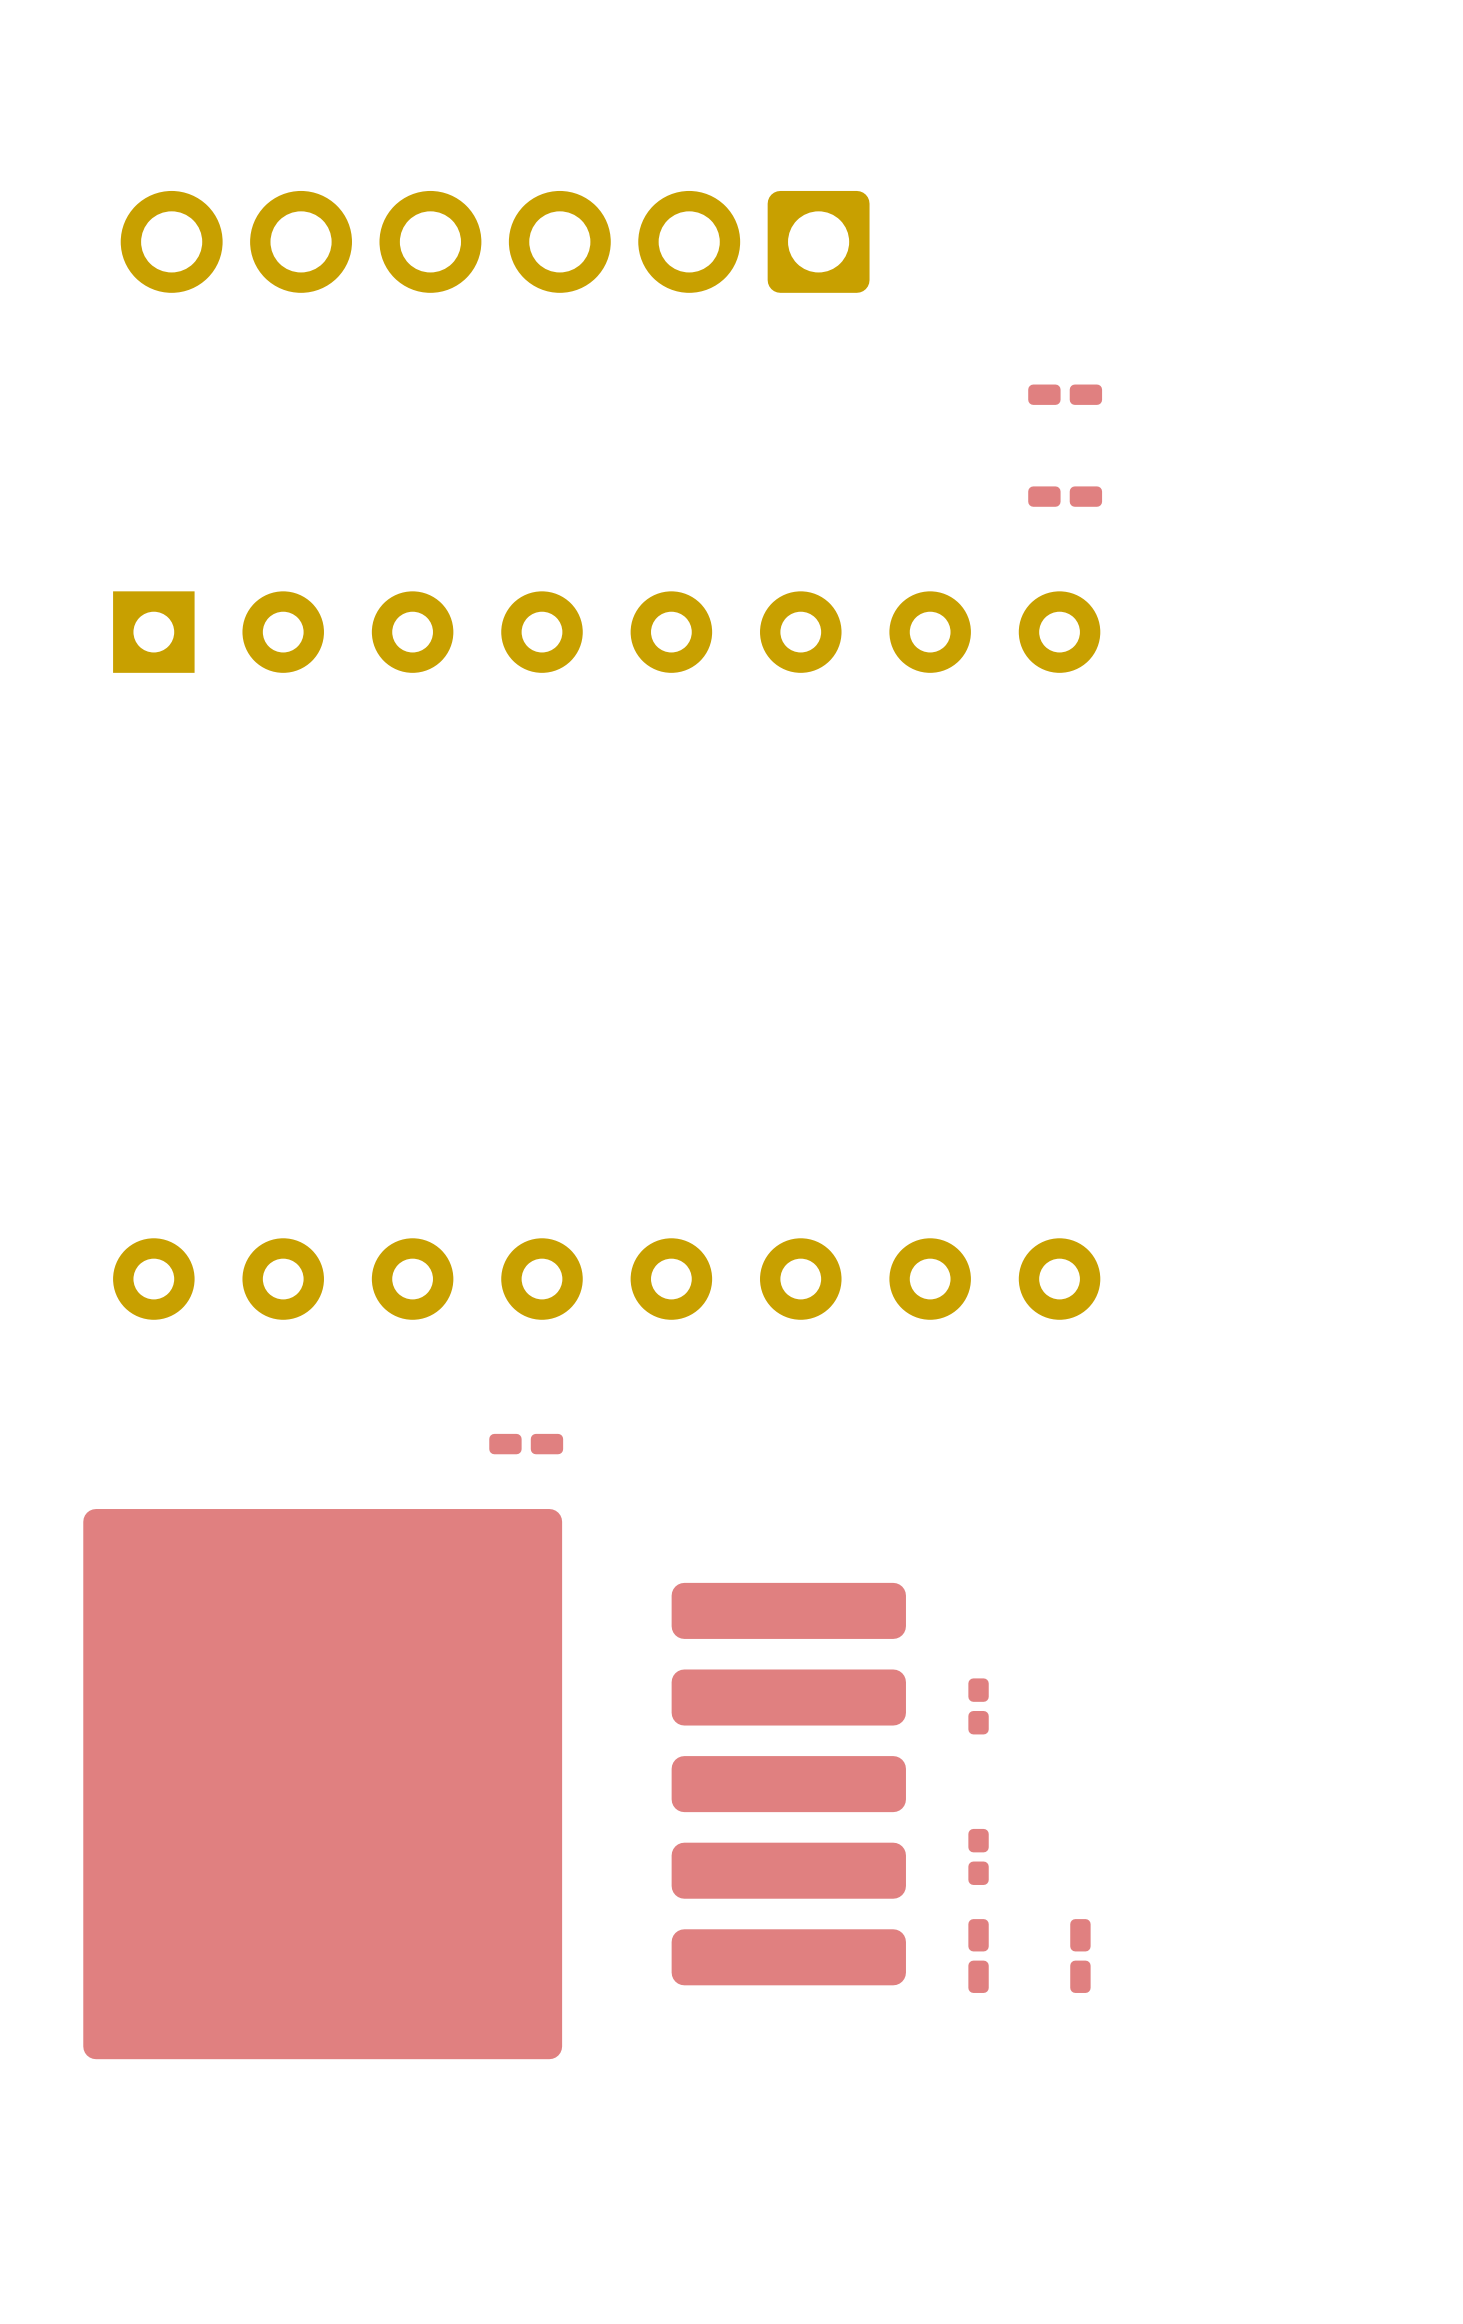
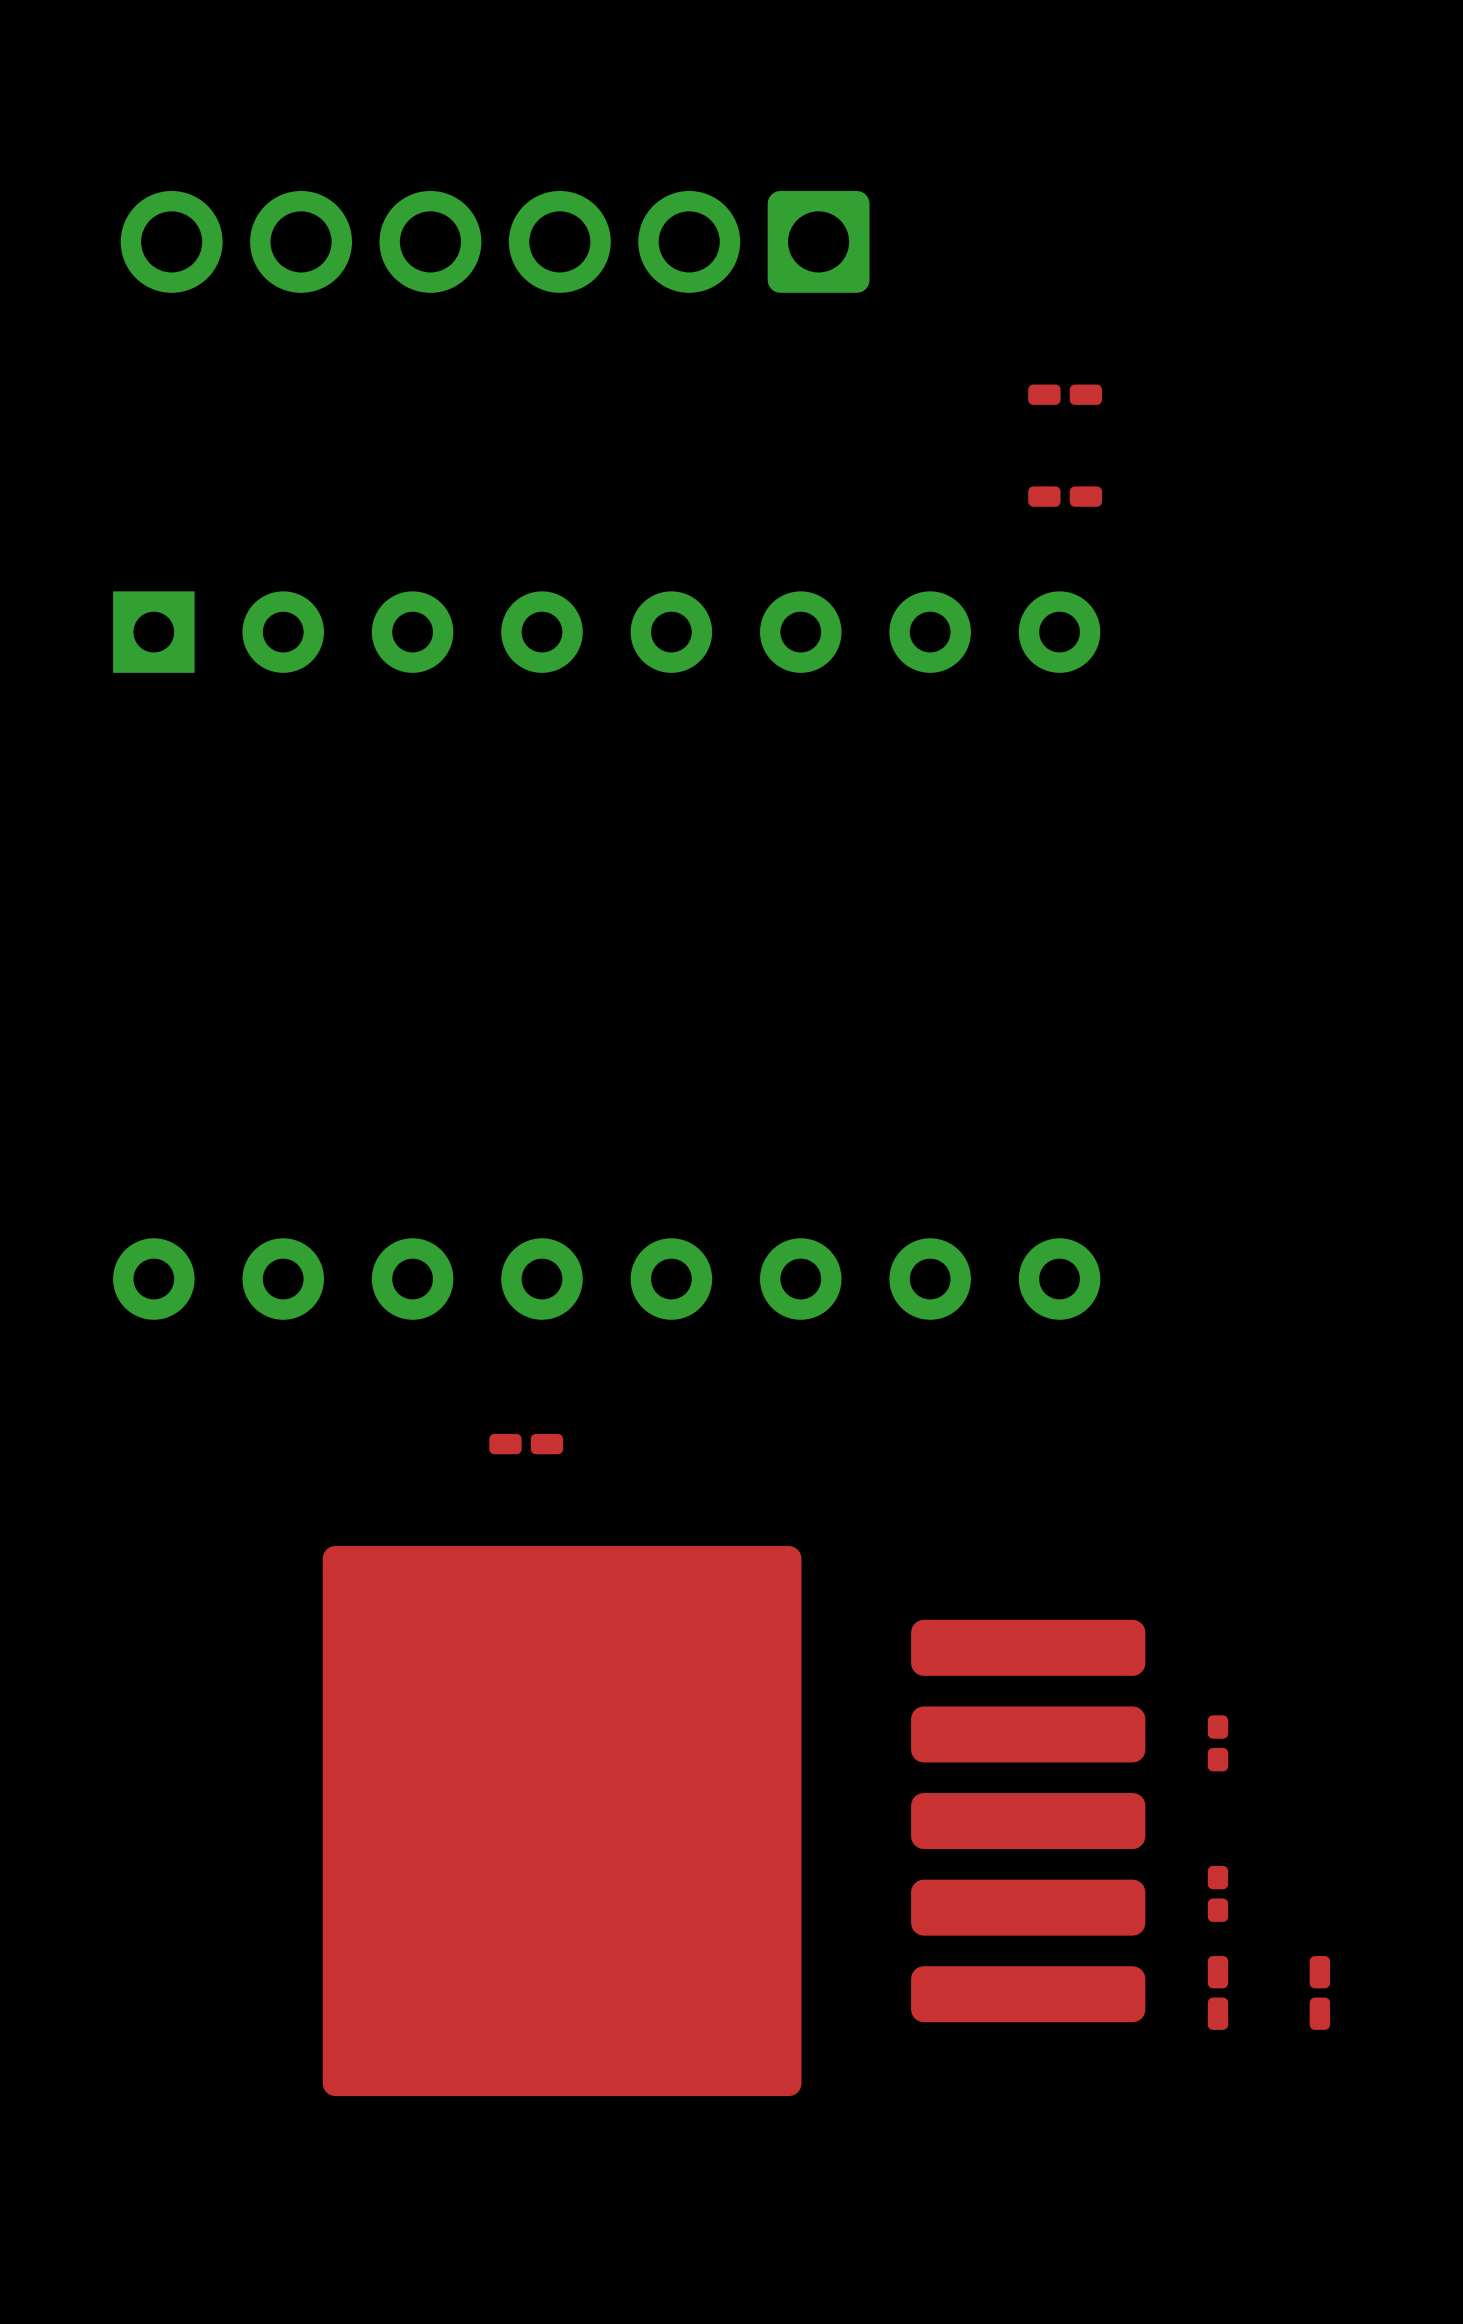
part: (978, 1706) -> none
part: none -> (1217, 1743)
part position: (494, 1784) -> (734, 1821)
part: (978, 1856) -> none
part: none -> (1217, 1893)
part: (978, 1956) -> none
part: (1080, 1956) -> none
part: none -> (1217, 1992)
part: none -> (1319, 1992)

